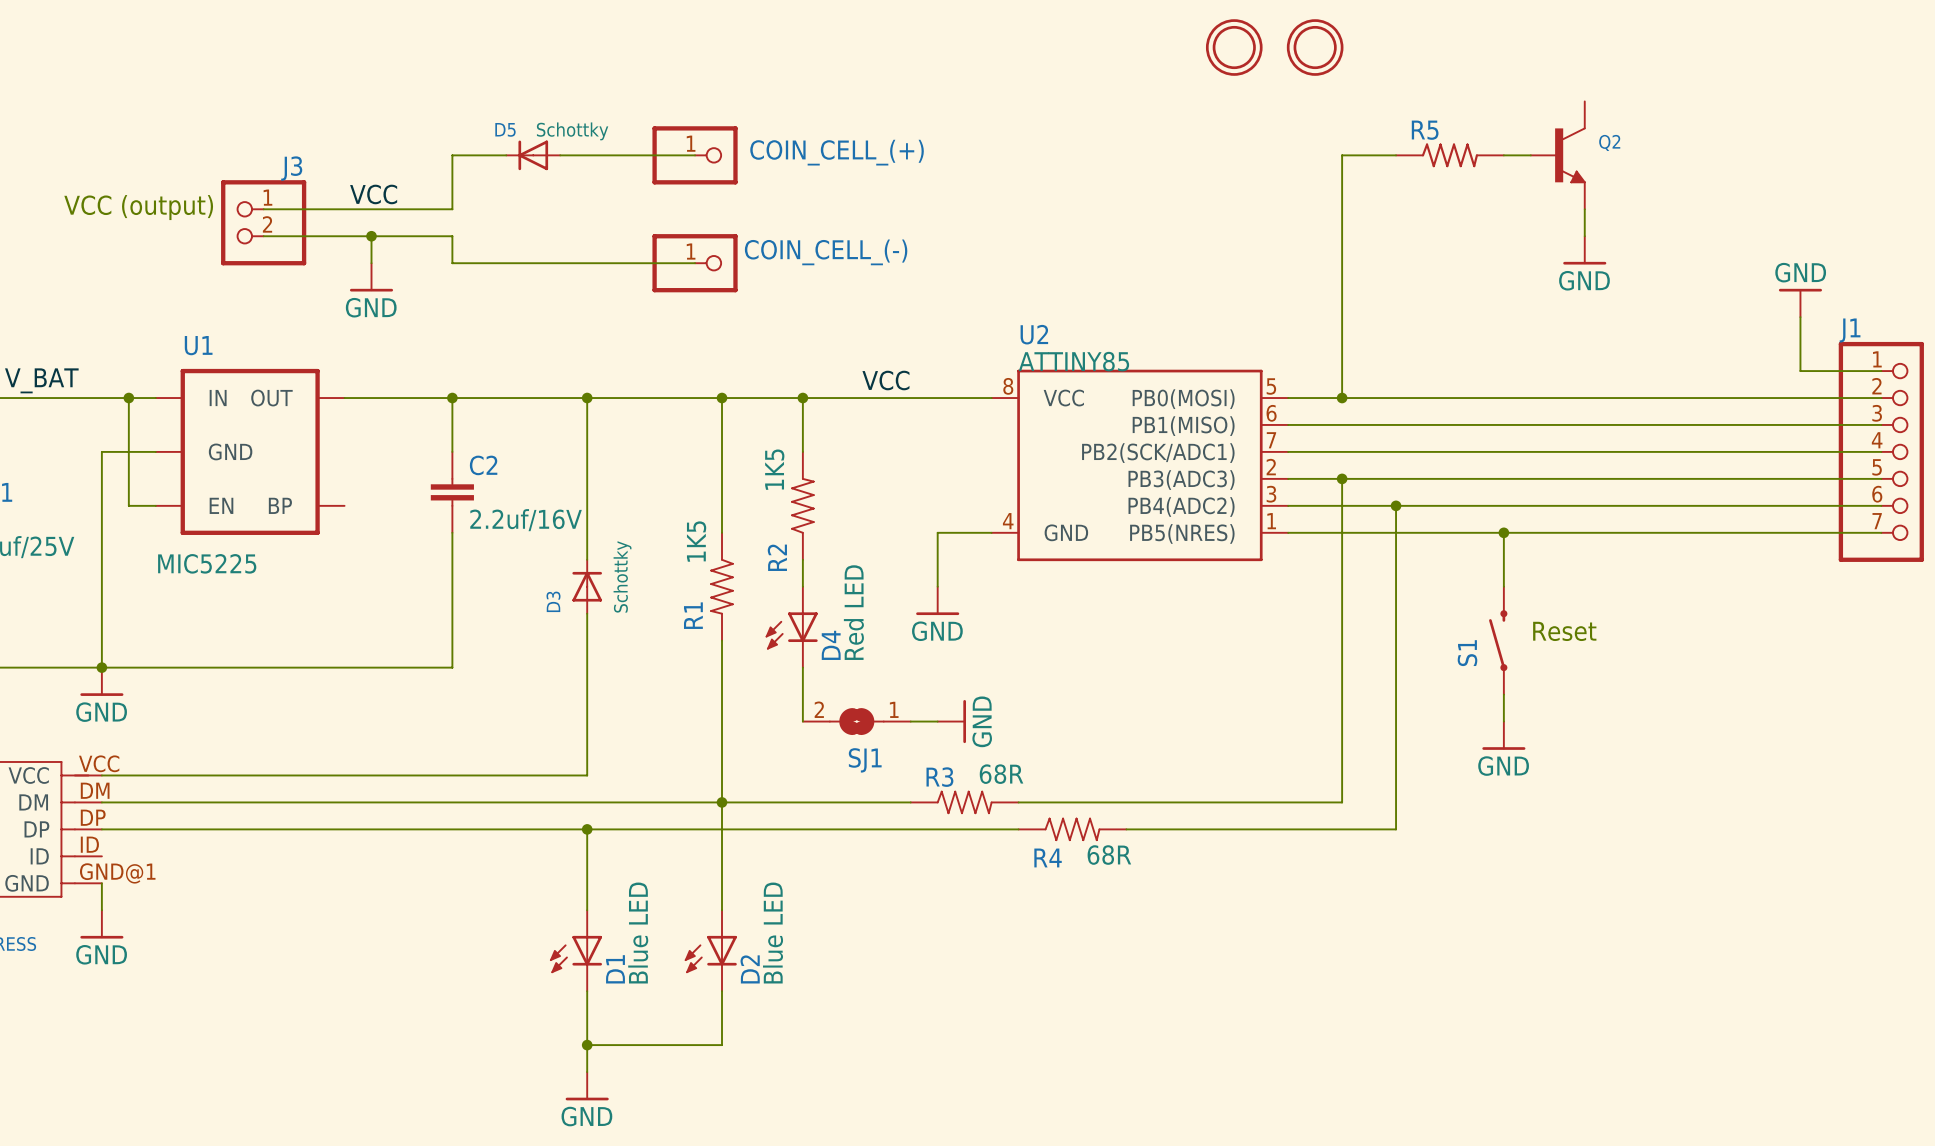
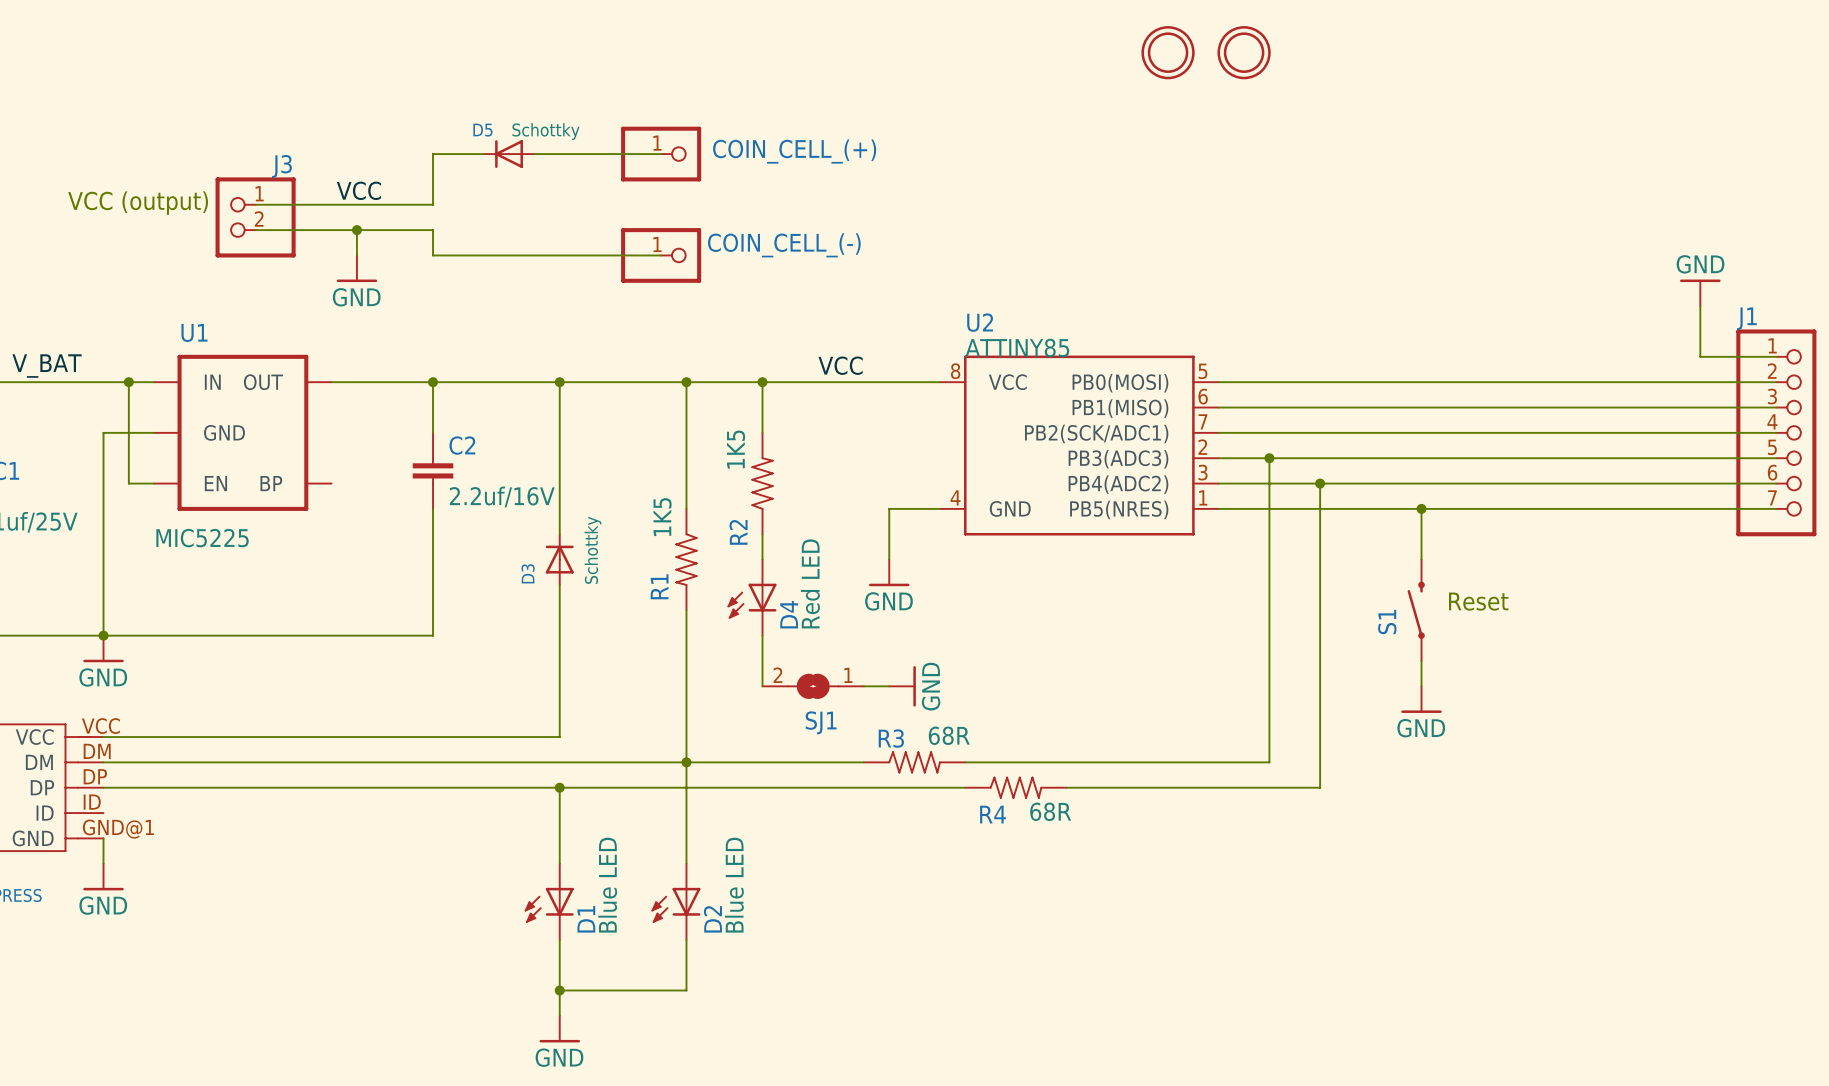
wire: (1396, 155) (1342, 155) (1342, 398) -> none
R5: (1449, 155) -> none
wire: (1503, 155) (1530, 155) -> none
Q2: (1558, 155) -> none
wire: (1584, 209) (1584, 236) -> none
power symbol: GND (1584, 250) -> none
junction: (1342, 398) -> none

